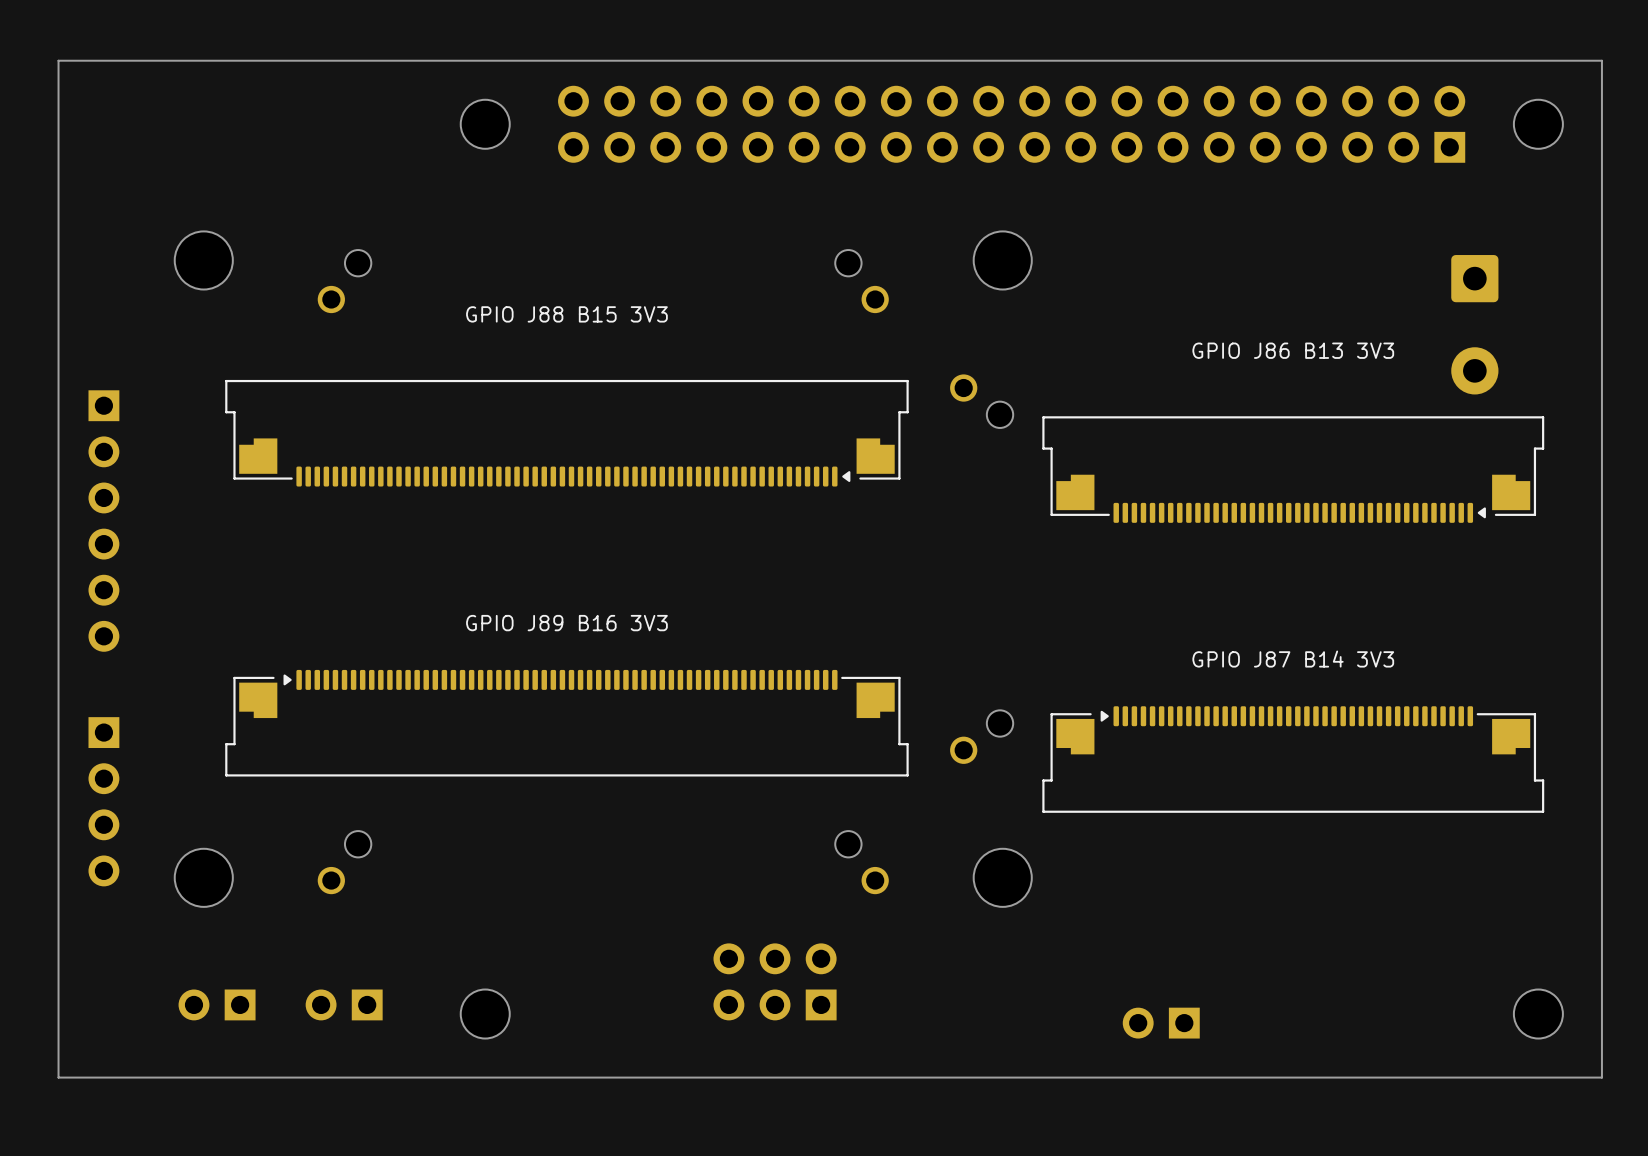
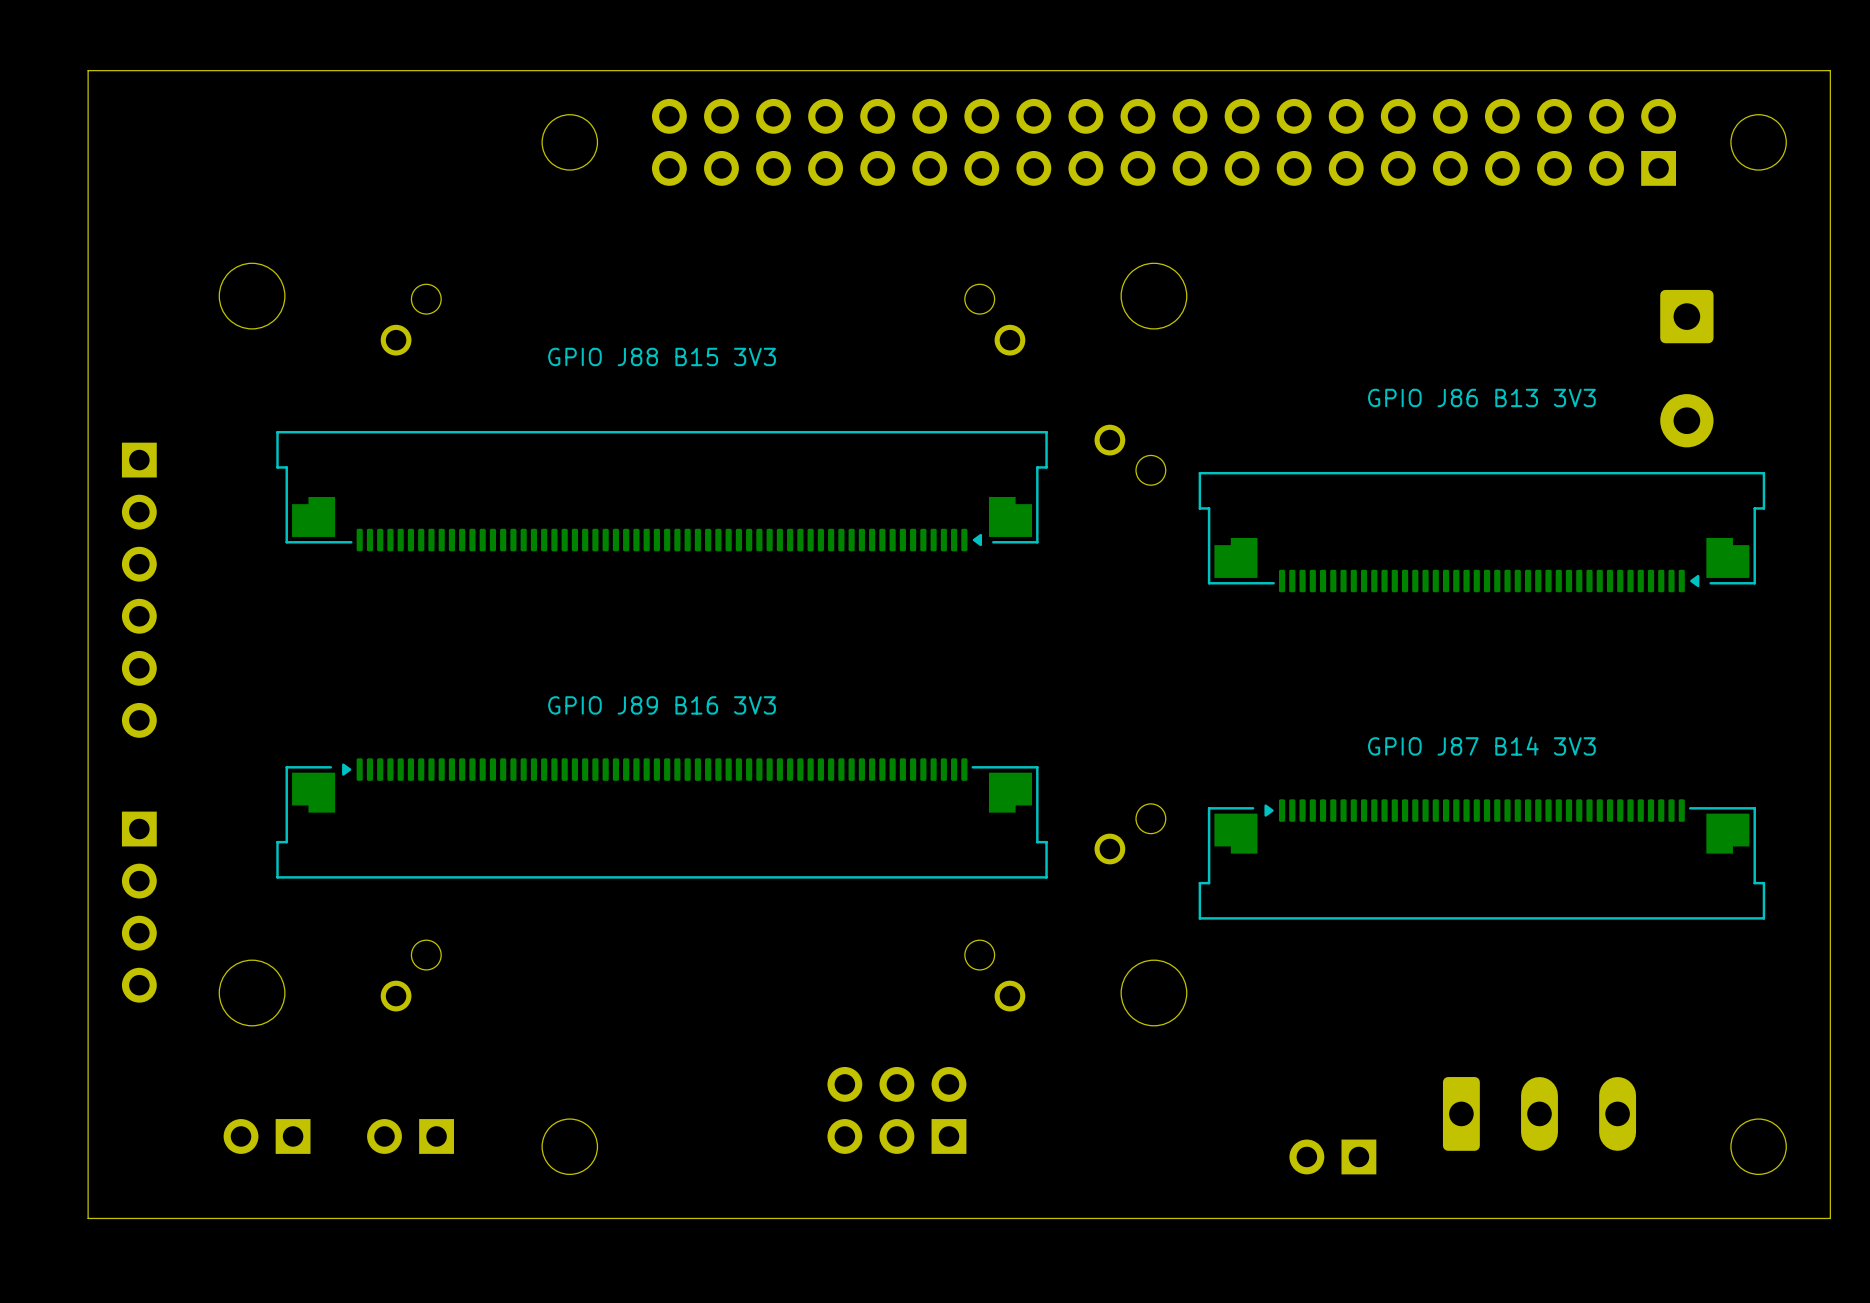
part: none -> (1539, 1113)

